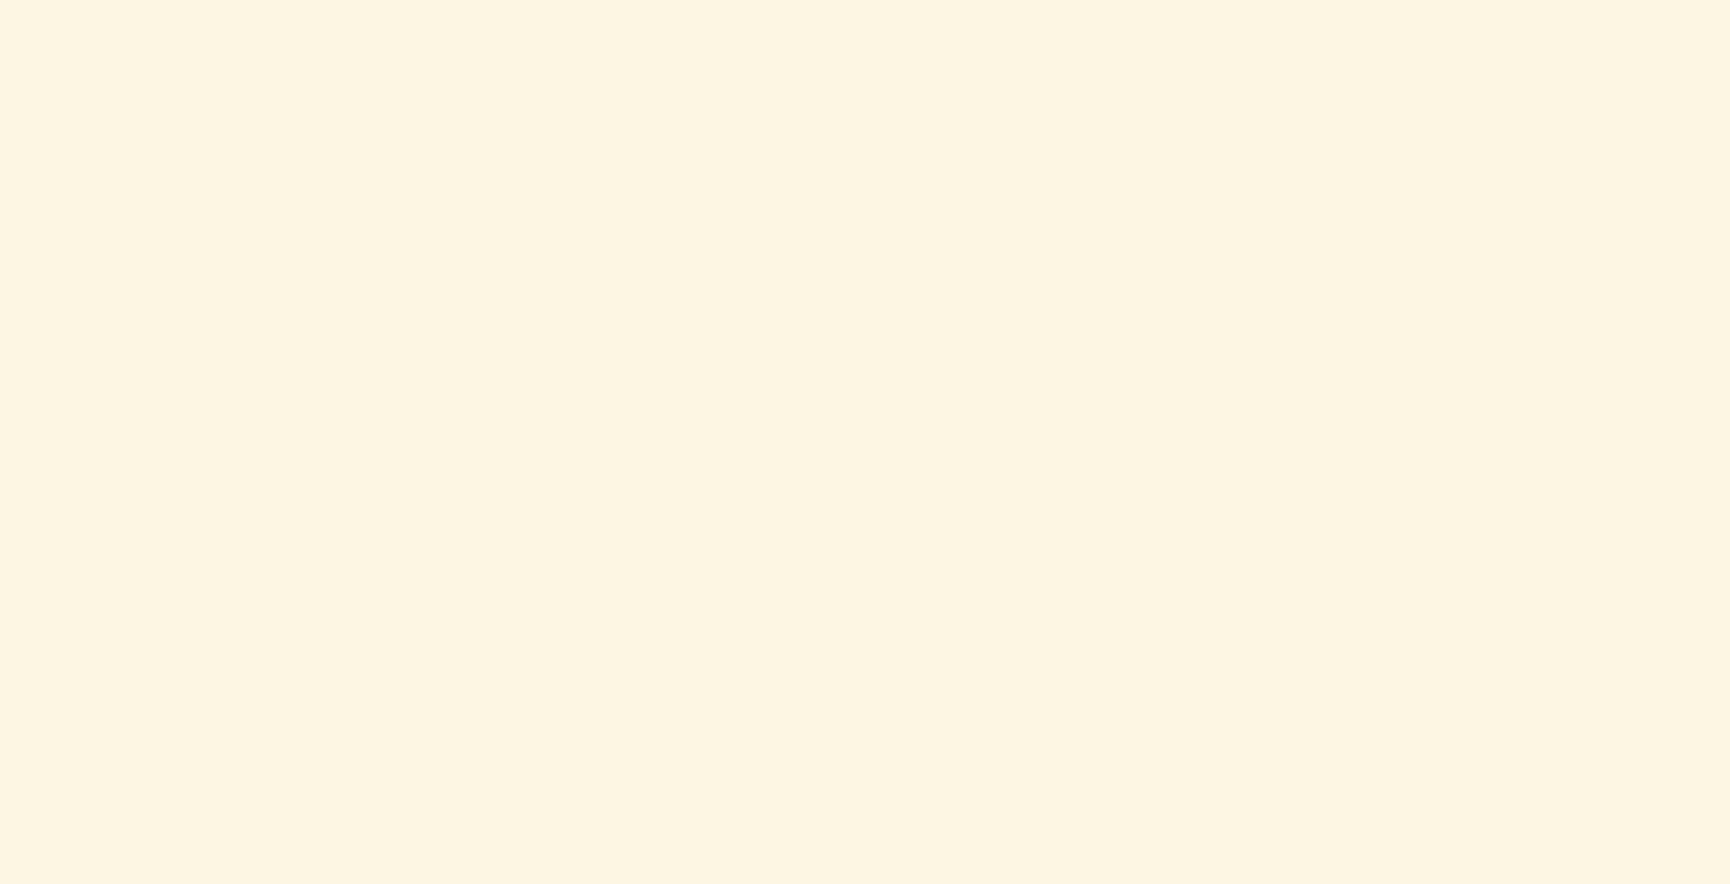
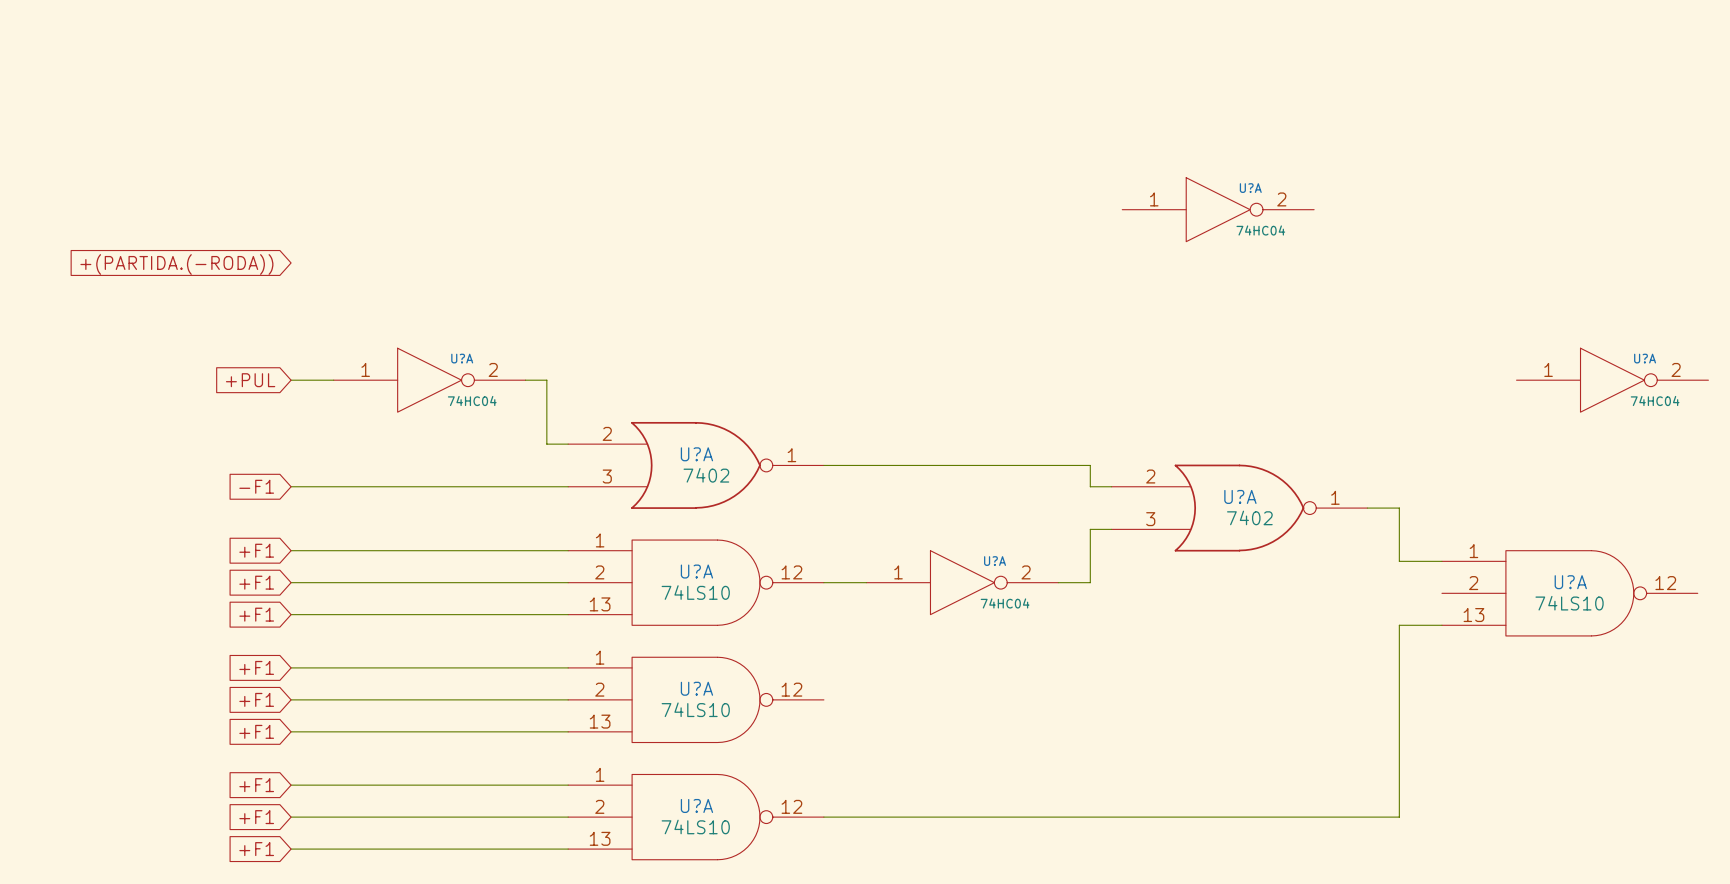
U?A: none -> 74HC04 (1218, 209)
global label: none -> +(PARTIDA.(-RODA)) (176, 264)
global label: none -> +PUL (250, 380)
wire: none -> (291, 380) (333, 380)
U?A: none -> 74HC04 (429, 380)
wire: none -> (525, 380) (546, 380) (546, 444) (568, 444)
U?A: none -> 74HC04 (1612, 380)
U?A: none -> 7402 (696, 465)
wire: none -> (823, 465) (1090, 465) (1090, 486) (1111, 486)
global label: none -> -F1 (256, 486)
wire: none -> (291, 486) (568, 486)
U?A: none -> 7402 (1239, 508)
wire: none -> (1367, 508) (1399, 508) (1399, 561) (1441, 561)
wire: none -> (1111, 529) (1090, 529) (1090, 582) (1058, 582)
global label: none -> +F1 (256, 550)
wire: none -> (291, 550) (568, 550)
global label: none -> +F1 (256, 582)
wire: none -> (291, 582) (568, 582)
U?A: none -> 74LS10 (696, 582)
wire: none -> (823, 582) (866, 582)
U?A: none -> 74HC04 (962, 582)
U?A: none -> 74LS10 (1569, 593)
global label: none -> +F1 (256, 614)
wire: none -> (291, 614) (568, 614)
wire: none -> (1441, 625) (1399, 625) (1399, 817) (823, 817)
global label: none -> +F1 (256, 667)
wire: none -> (291, 667) (568, 667)
global label: none -> +F1 (256, 699)
wire: none -> (291, 699) (568, 699)
U?A: none -> 74LS10 (696, 699)
global label: none -> +F1 (256, 731)
wire: none -> (291, 731) (568, 731)
global label: none -> +F1 (256, 785)
wire: none -> (291, 785) (568, 785)
global label: none -> +F1 (256, 817)
wire: none -> (291, 817) (568, 817)
U?A: none -> 74LS10 (696, 817)
global label: none -> +F1 (256, 849)
wire: none -> (291, 849) (568, 849)

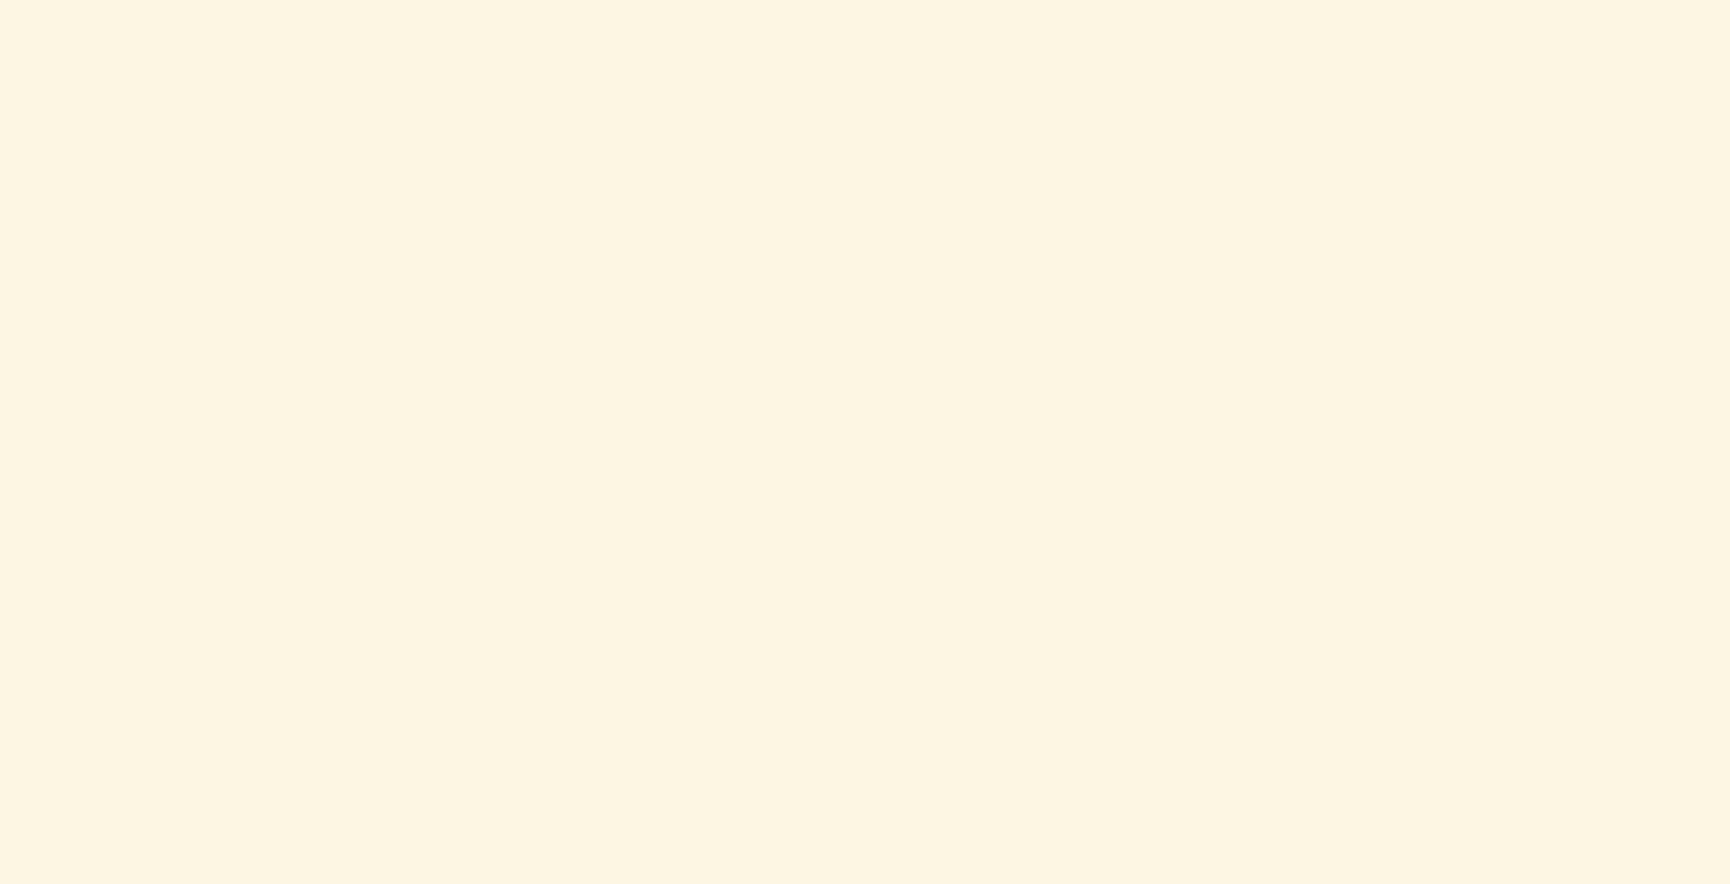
U?A: 74HC04 (1218, 209) -> none
global label: +(PARTIDA.(-RODA)) (176, 264) -> none
global label: +PUL (250, 380) -> none
wire: (291, 380) (333, 380) -> none
U?A: 74HC04 (429, 380) -> none
wire: (525, 380) (546, 380) (546, 444) (568, 444) -> none
U?A: 74HC04 (1612, 380) -> none
U?A: 7402 (696, 465) -> none
wire: (823, 465) (1090, 465) (1090, 486) (1111, 486) -> none
global label: -F1 (256, 486) -> none
wire: (291, 486) (568, 486) -> none
U?A: 7402 (1239, 508) -> none
wire: (1367, 508) (1399, 508) (1399, 561) (1441, 561) -> none
wire: (1111, 529) (1090, 529) (1090, 582) (1058, 582) -> none
global label: +F1 (256, 550) -> none
wire: (291, 550) (568, 550) -> none
global label: +F1 (256, 582) -> none
wire: (291, 582) (568, 582) -> none
U?A: 74LS10 (696, 582) -> none
wire: (823, 582) (866, 582) -> none
U?A: 74HC04 (962, 582) -> none
U?A: 74LS10 (1569, 593) -> none
global label: +F1 (256, 614) -> none
wire: (291, 614) (568, 614) -> none
wire: (1441, 625) (1399, 625) (1399, 817) (823, 817) -> none
global label: +F1 (256, 667) -> none
wire: (291, 667) (568, 667) -> none
global label: +F1 (256, 699) -> none
wire: (291, 699) (568, 699) -> none
U?A: 74LS10 (696, 699) -> none
global label: +F1 (256, 731) -> none
wire: (291, 731) (568, 731) -> none
global label: +F1 (256, 785) -> none
wire: (291, 785) (568, 785) -> none
global label: +F1 (256, 817) -> none
wire: (291, 817) (568, 817) -> none
U?A: 74LS10 (696, 817) -> none
global label: +F1 (256, 849) -> none
wire: (291, 849) (568, 849) -> none

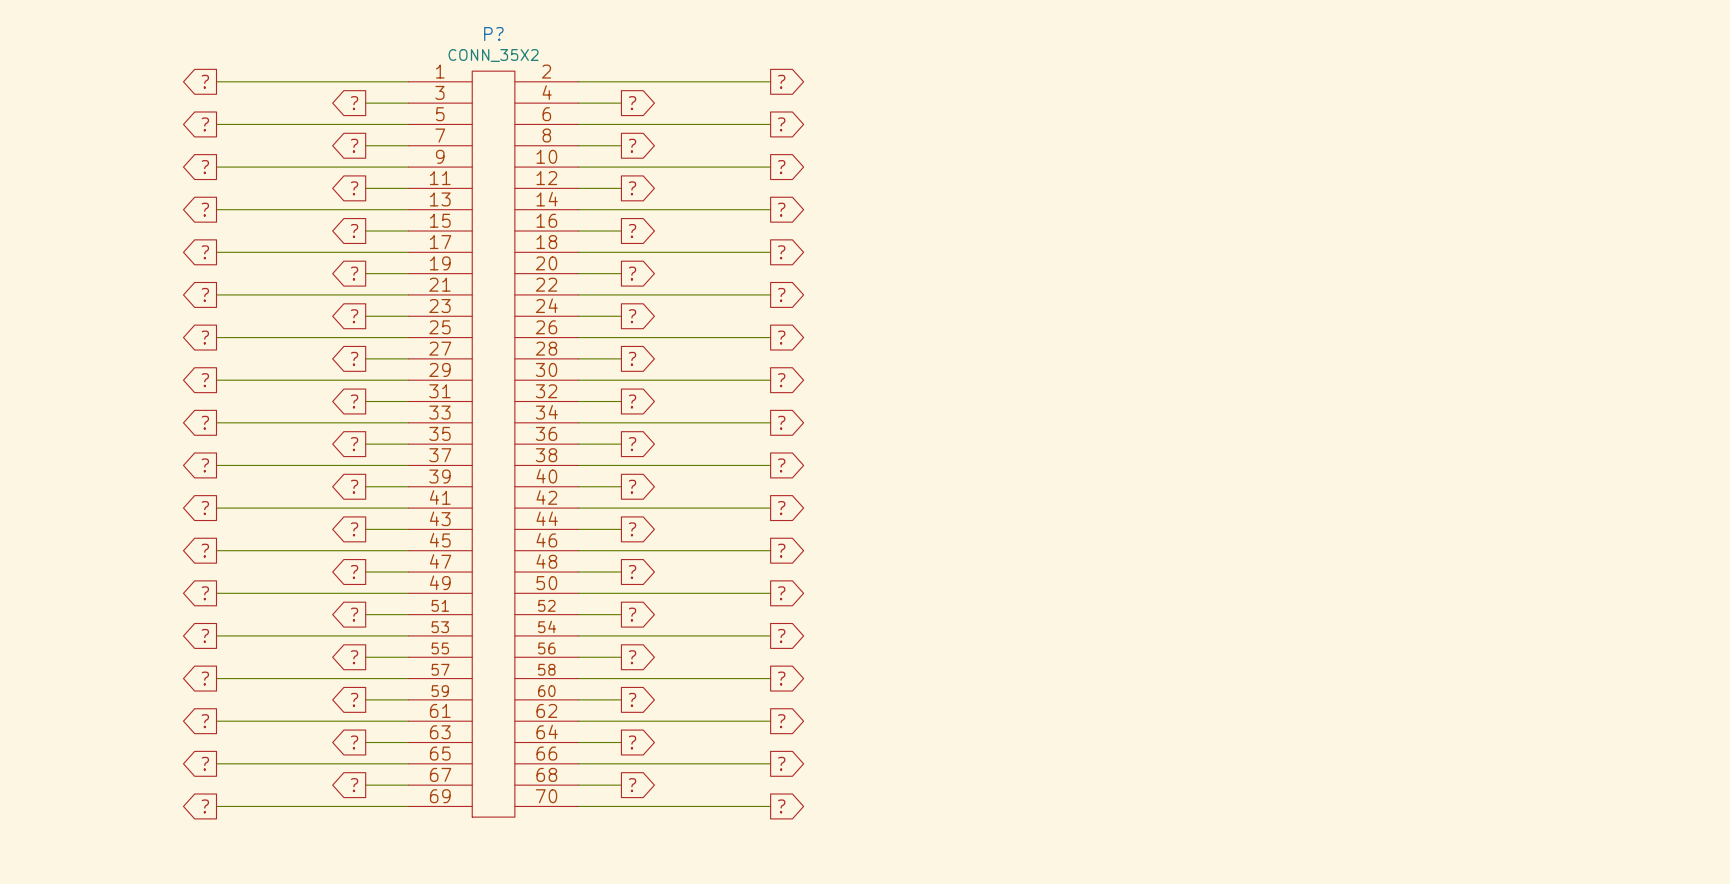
global label: none -> ? (205, 81)
wire: none -> (216, 81) (408, 81)
wire: none -> (578, 81) (770, 81)
global label: none -> ? (781, 81)
global label: none -> ? (354, 103)
wire: none -> (365, 103) (408, 103)
wire: none -> (578, 103) (621, 103)
global label: none -> ? (632, 103)
global label: none -> ? (205, 124)
wire: none -> (216, 124) (408, 124)
wire: none -> (578, 124) (770, 124)
global label: none -> ? (781, 124)
global label: none -> ? (354, 145)
wire: none -> (365, 145) (408, 145)
wire: none -> (578, 145) (621, 145)
global label: none -> ? (632, 145)
global label: none -> ? (205, 167)
wire: none -> (216, 167) (408, 167)
wire: none -> (578, 167) (770, 167)
global label: none -> ? (781, 167)
global label: none -> ? (354, 188)
wire: none -> (365, 188) (408, 188)
wire: none -> (578, 188) (621, 188)
global label: none -> ? (632, 188)
global label: none -> ? (205, 209)
wire: none -> (216, 209) (408, 209)
wire: none -> (578, 209) (770, 209)
global label: none -> ? (781, 209)
global label: none -> ? (354, 231)
wire: none -> (365, 231) (408, 231)
wire: none -> (578, 231) (621, 231)
global label: none -> ? (632, 231)
global label: none -> ? (205, 252)
wire: none -> (216, 252) (408, 252)
wire: none -> (578, 252) (770, 252)
global label: none -> ? (781, 252)
global label: none -> ? (354, 273)
wire: none -> (365, 273) (408, 273)
wire: none -> (578, 273) (621, 273)
global label: none -> ? (632, 273)
global label: none -> ? (205, 294)
wire: none -> (216, 294) (408, 294)
wire: none -> (578, 294) (770, 294)
global label: none -> ? (781, 294)
global label: none -> ? (354, 316)
wire: none -> (365, 316) (408, 316)
wire: none -> (578, 316) (621, 316)
global label: none -> ? (632, 316)
global label: none -> ? (205, 337)
wire: none -> (216, 337) (408, 337)
wire: none -> (578, 337) (770, 337)
global label: none -> ? (781, 337)
global label: none -> ? (354, 358)
wire: none -> (365, 358) (408, 358)
wire: none -> (578, 358) (621, 358)
global label: none -> ? (632, 358)
global label: none -> ? (205, 380)
wire: none -> (216, 380) (408, 380)
wire: none -> (578, 380) (770, 380)
global label: none -> ? (781, 380)
global label: none -> ? (354, 401)
wire: none -> (365, 401) (408, 401)
wire: none -> (578, 401) (621, 401)
global label: none -> ? (632, 401)
global label: none -> ? (205, 422)
wire: none -> (216, 422) (408, 422)
wire: none -> (578, 422) (770, 422)
global label: none -> ? (781, 422)
global label: none -> ? (354, 444)
wire: none -> (365, 444) (408, 444)
P?: none -> CONN_35X2 (493, 444)
wire: none -> (578, 444) (621, 444)
global label: none -> ? (632, 444)
global label: none -> ? (205, 465)
wire: none -> (216, 465) (408, 465)
wire: none -> (578, 465) (770, 465)
global label: none -> ? (781, 465)
global label: none -> ? (354, 486)
wire: none -> (365, 486) (408, 486)
wire: none -> (578, 486) (621, 486)
global label: none -> ? (632, 486)
global label: none -> ? (205, 508)
wire: none -> (216, 508) (408, 508)
wire: none -> (578, 508) (770, 508)
global label: none -> ? (781, 508)
global label: none -> ? (354, 529)
wire: none -> (365, 529) (408, 529)
wire: none -> (578, 529) (621, 529)
global label: none -> ? (632, 529)
global label: none -> ? (205, 550)
wire: none -> (216, 550) (408, 550)
wire: none -> (578, 550) (770, 550)
global label: none -> ? (781, 550)
global label: none -> ? (354, 572)
wire: none -> (365, 572) (408, 572)
wire: none -> (578, 572) (621, 572)
global label: none -> ? (632, 572)
global label: none -> ? (205, 593)
wire: none -> (216, 593) (408, 593)
wire: none -> (578, 593) (770, 593)
global label: none -> ? (781, 593)
global label: none -> ? (354, 614)
wire: none -> (365, 614) (408, 614)
wire: none -> (578, 614) (621, 614)
global label: none -> ? (632, 614)
global label: none -> ? (205, 635)
wire: none -> (216, 635) (408, 635)
wire: none -> (578, 635) (770, 635)
global label: none -> ? (781, 635)
global label: none -> ? (354, 657)
wire: none -> (365, 657) (408, 657)
wire: none -> (578, 657) (621, 657)
global label: none -> ? (632, 657)
global label: none -> ? (205, 678)
wire: none -> (216, 678) (408, 678)
wire: none -> (578, 678) (770, 678)
global label: none -> ? (781, 678)
global label: none -> ? (354, 699)
wire: none -> (365, 699) (408, 699)
wire: none -> (578, 699) (621, 699)
global label: none -> ? (632, 699)
global label: none -> ? (205, 721)
wire: none -> (216, 721) (408, 721)
wire: none -> (578, 721) (770, 721)
global label: none -> ? (781, 721)
global label: none -> ? (354, 742)
wire: none -> (365, 742) (408, 742)
wire: none -> (578, 742) (621, 742)
global label: none -> ? (632, 742)
global label: none -> ? (205, 763)
wire: none -> (216, 763) (408, 763)
wire: none -> (578, 763) (770, 763)
global label: none -> ? (781, 763)
global label: none -> ? (354, 785)
wire: none -> (365, 785) (408, 785)
wire: none -> (578, 785) (621, 785)
global label: none -> ? (632, 785)
global label: none -> ? (205, 806)
wire: none -> (216, 806) (408, 806)
wire: none -> (578, 806) (770, 806)
global label: none -> ? (781, 806)

